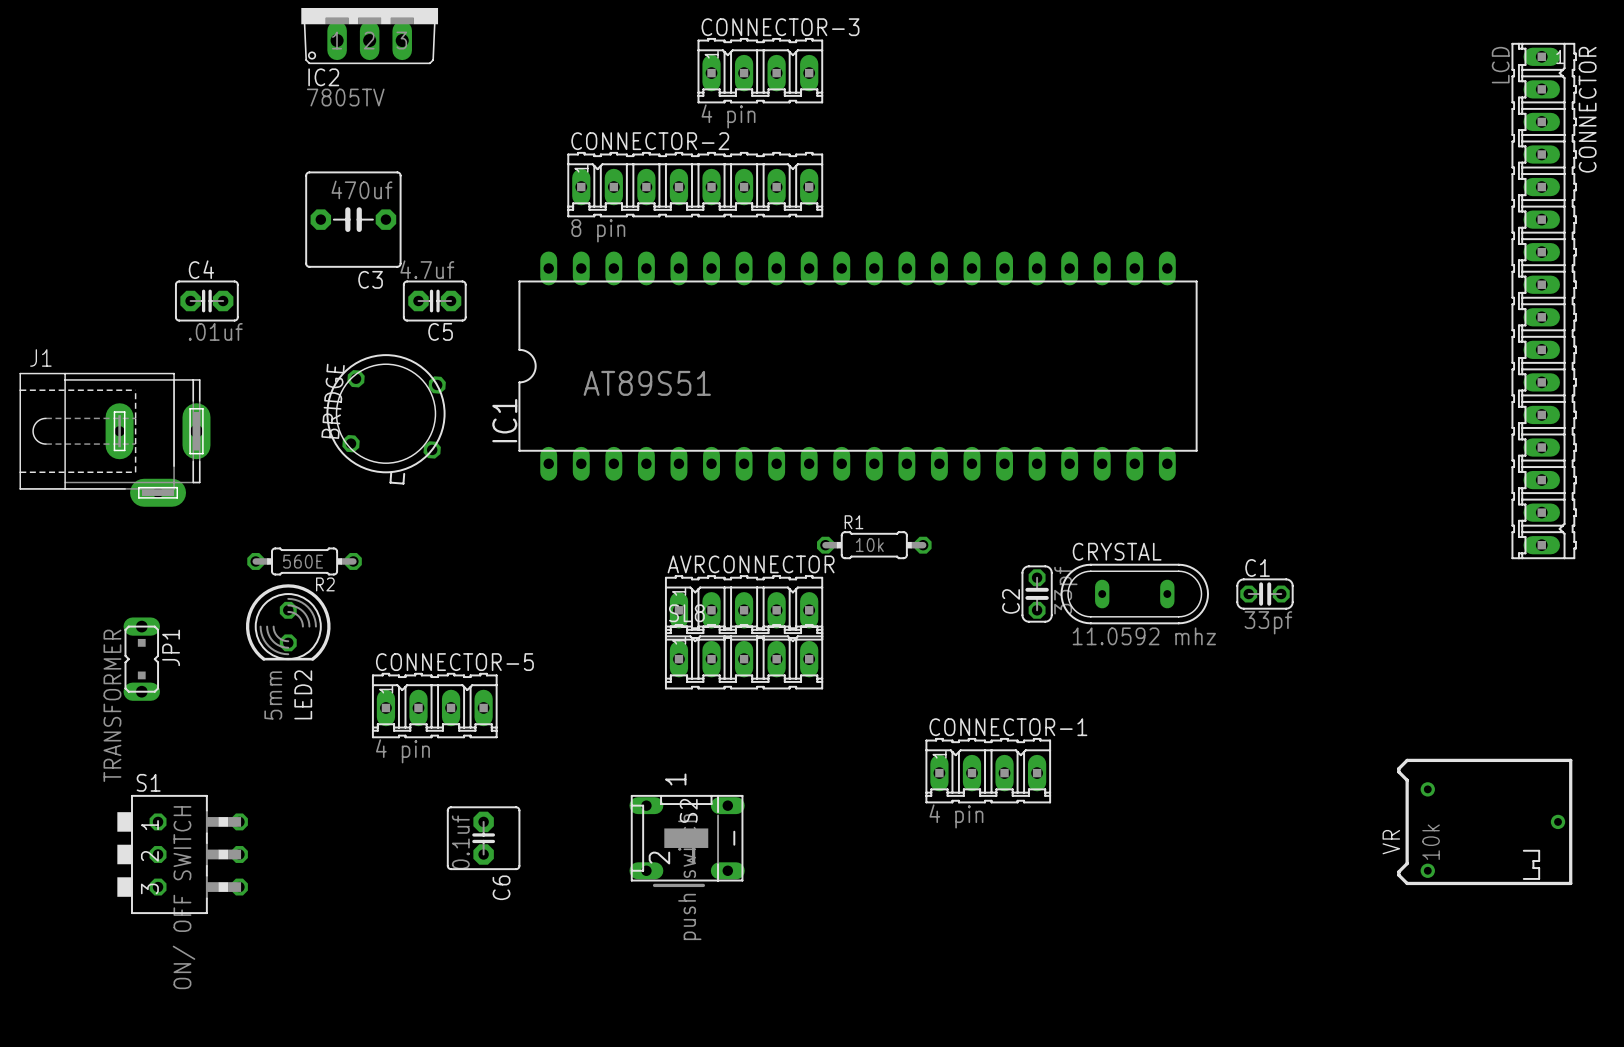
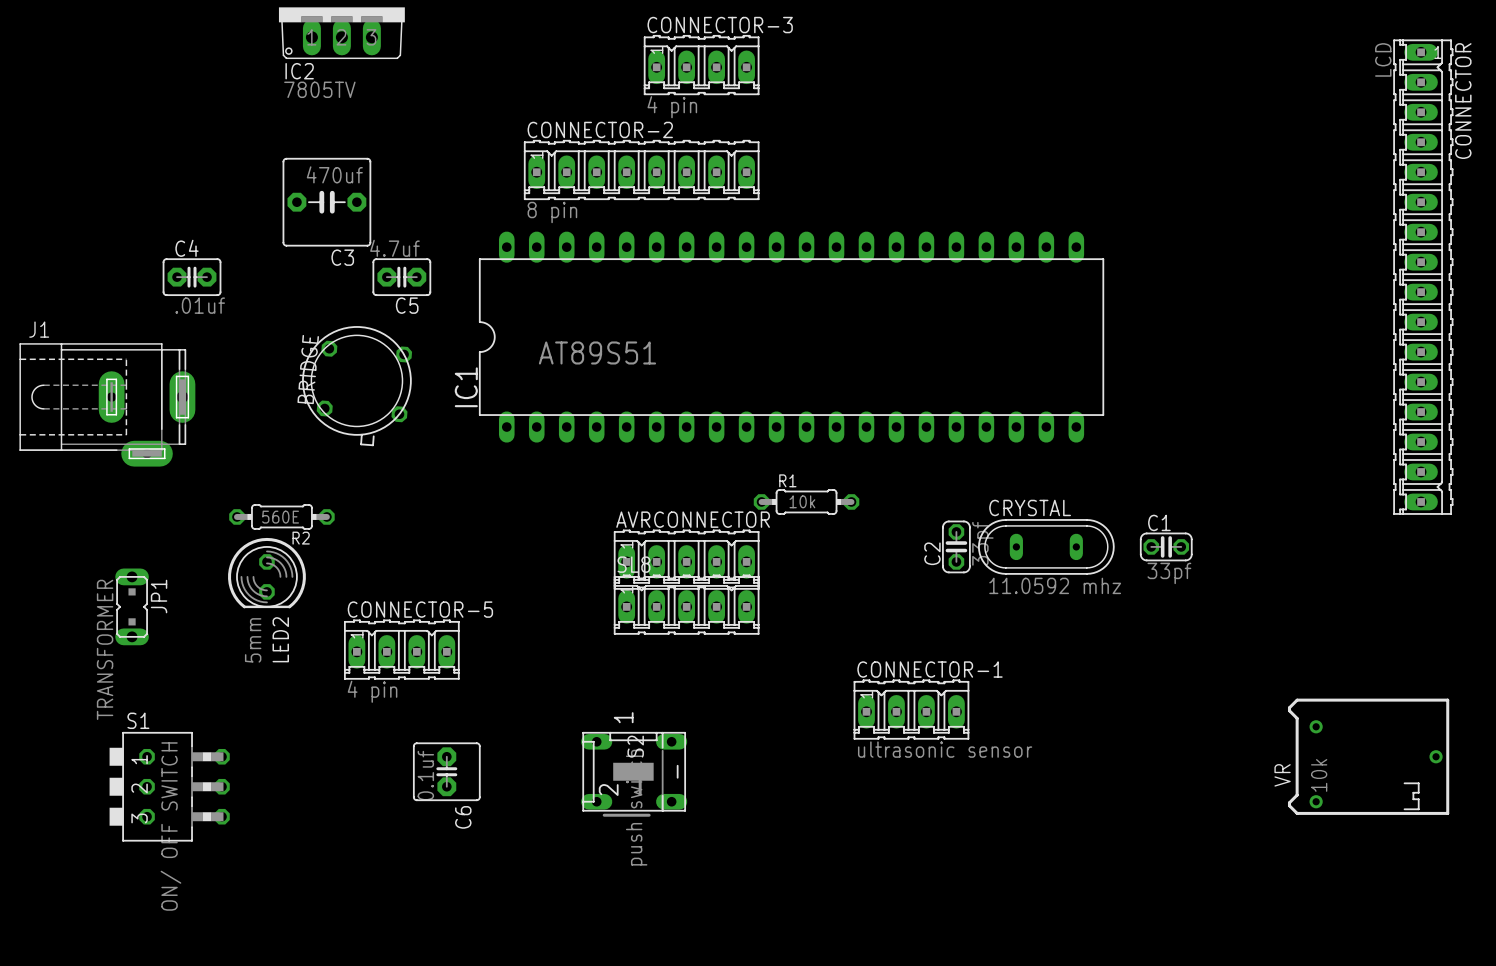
CONNECTOR-1 value: 4 pin (956, 816) -> ultrasonic sensor (945, 749)

